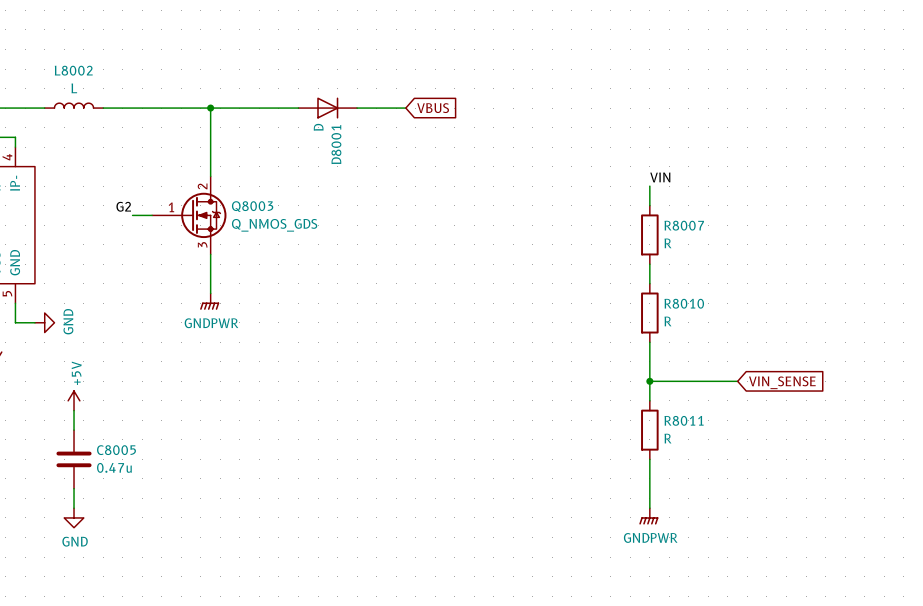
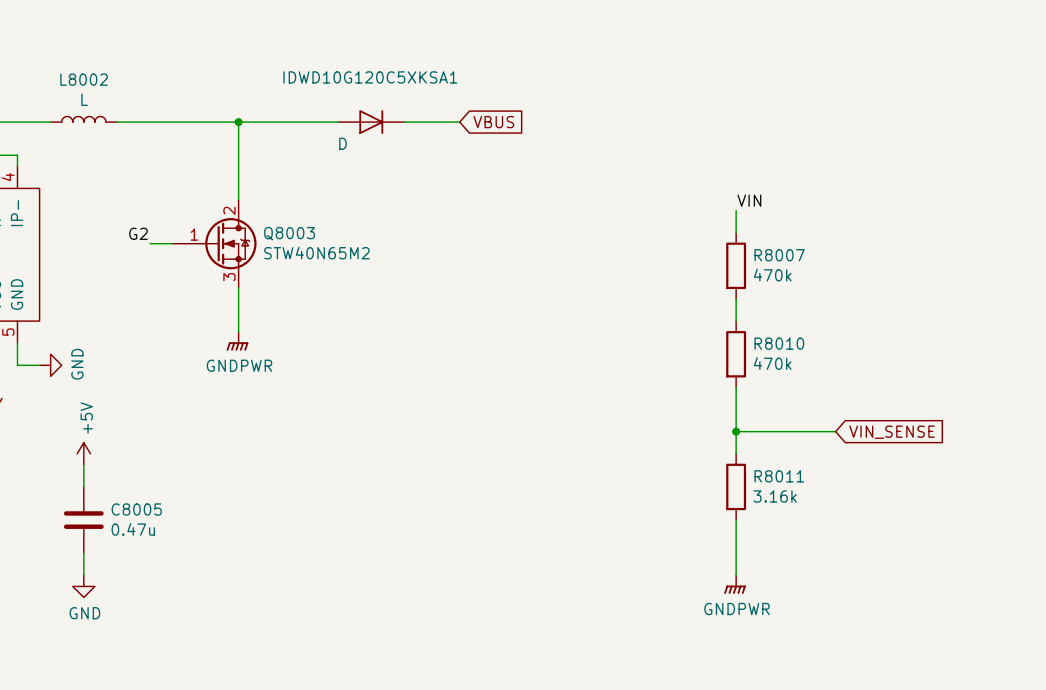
D8001 value rotation: 0° (318, 127) -> 90° clockwise (343, 143)
D8001 name: D8001 (336, 144) -> IDWD10G120C5XKSA1 (370, 77)
Q8003 value: Q_NMOS_GDS (274, 225) -> STW40N65M2 (316, 252)
R8007 value: R (667, 243) -> 470k (772, 275)
R8010 value: R (667, 321) -> 470k (772, 363)
R8011 value: R (667, 438) -> 3.16k (775, 496)

